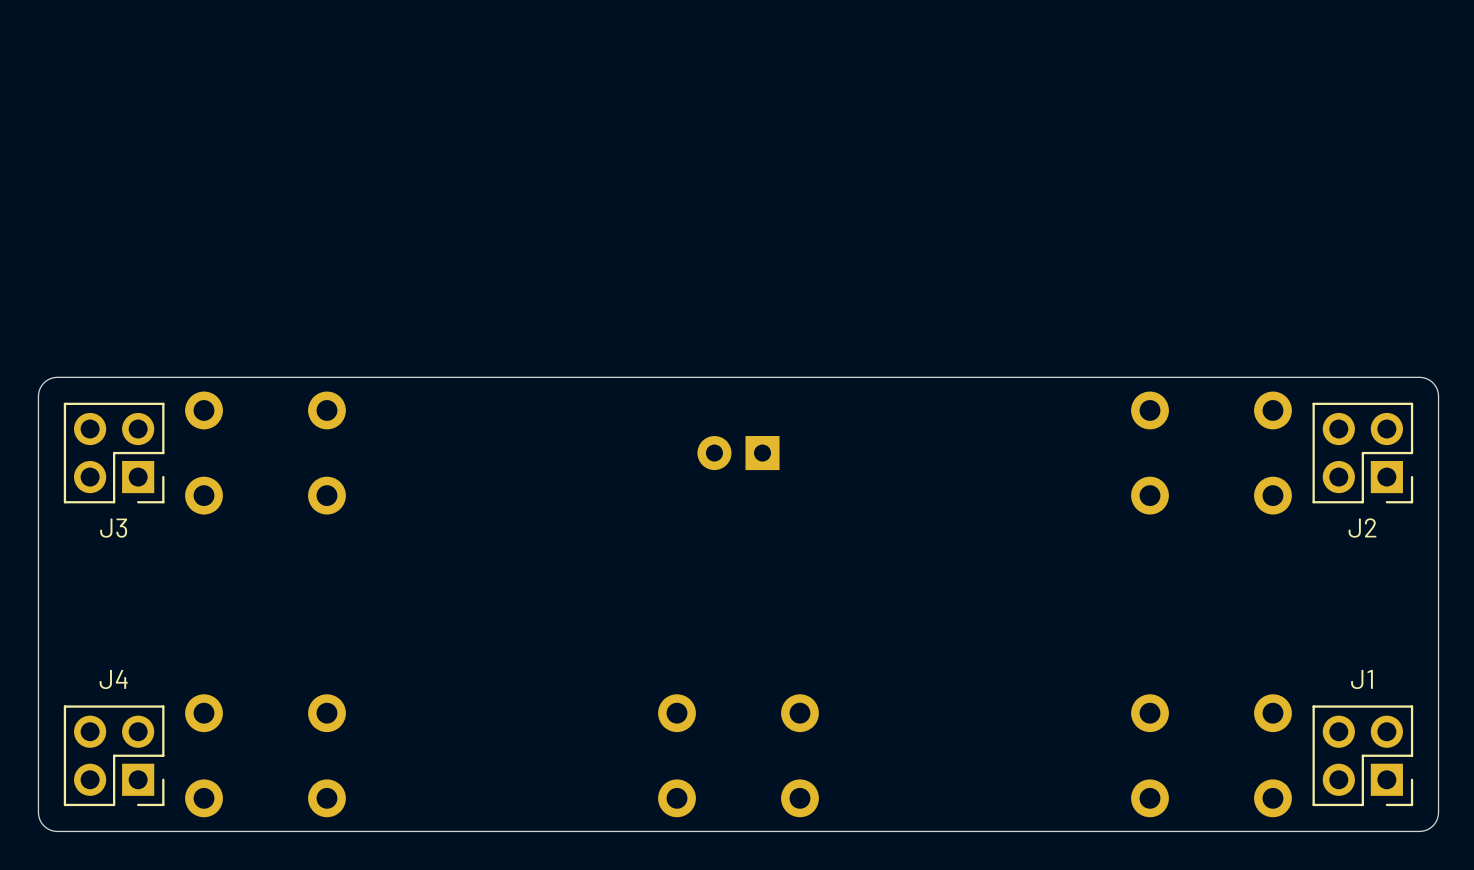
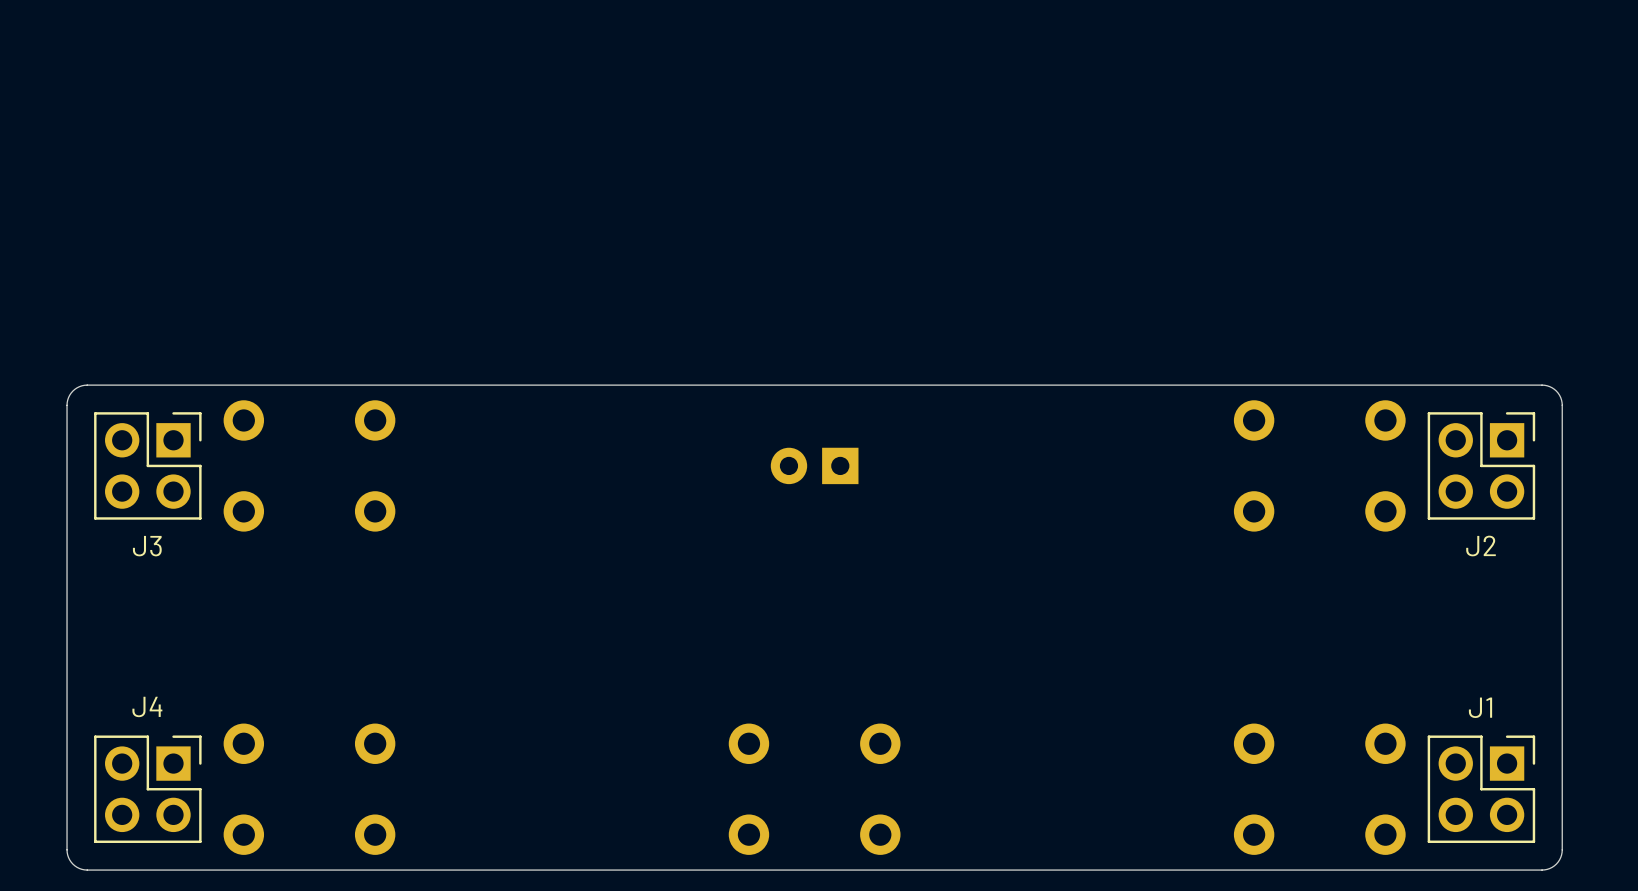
J3 rotation: 0° (114, 453) -> 90° counterclockwise (147, 465)
J2 rotation: 0° (1362, 453) -> 90° counterclockwise (1481, 465)
J4 rotation: 0° (114, 755) -> 90° counterclockwise (147, 789)
J1 rotation: 0° (1362, 755) -> 90° counterclockwise (1481, 789)

